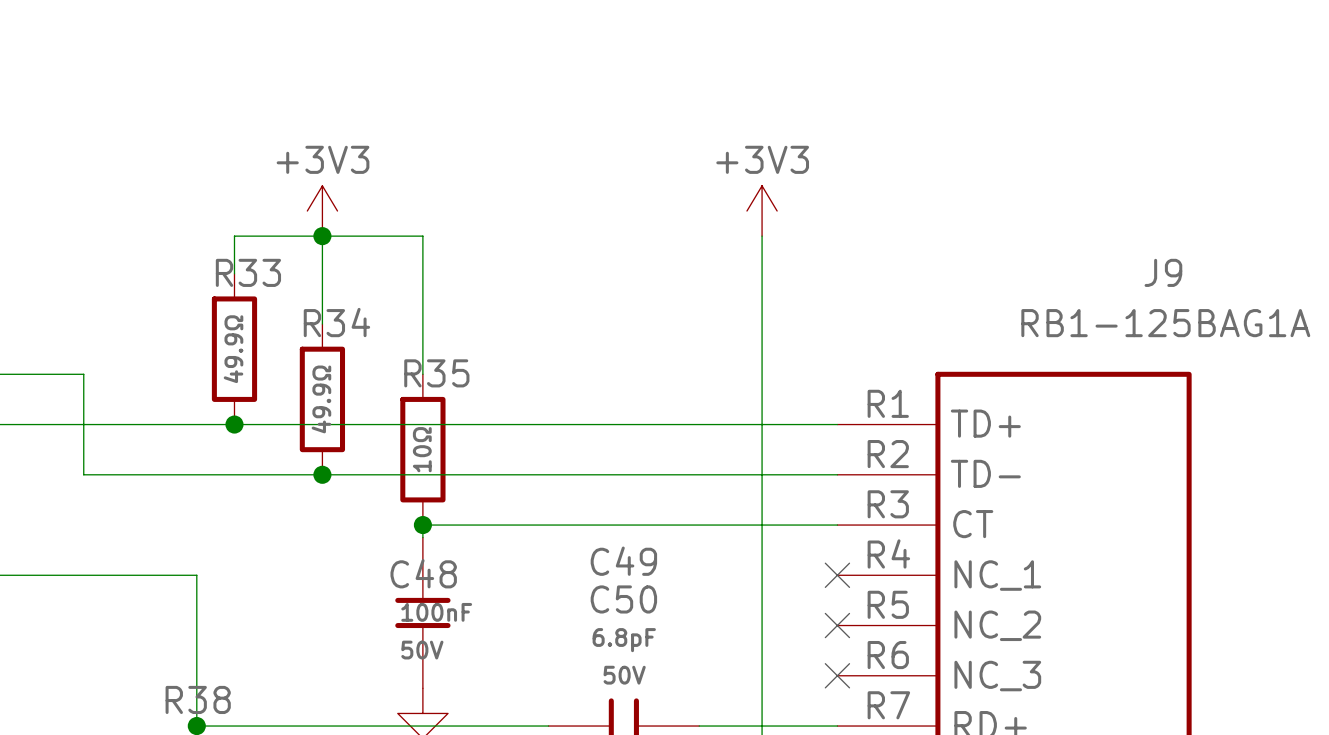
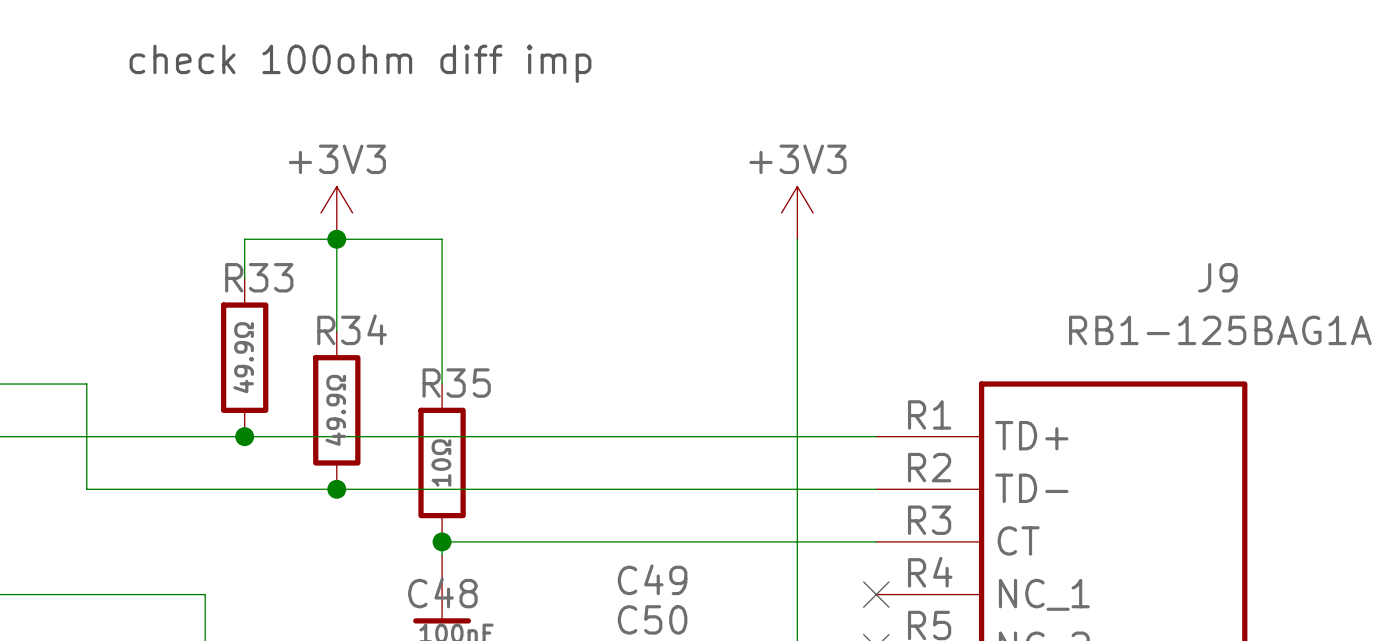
text: none -> check 100ohm diff imp (360, 63)

